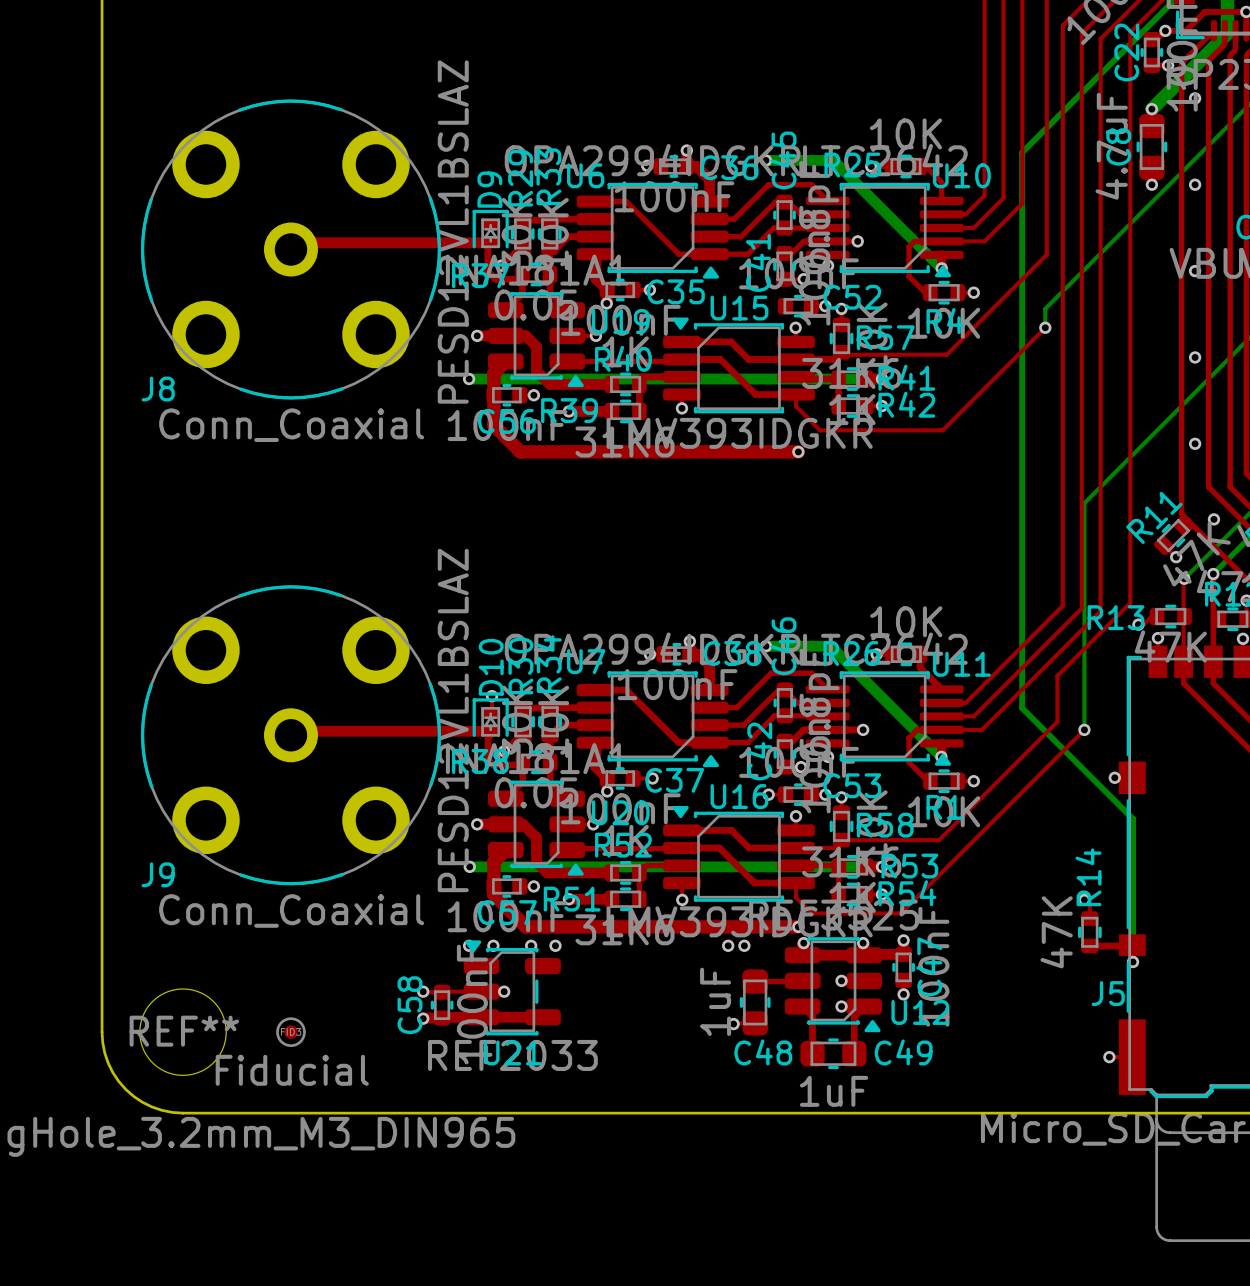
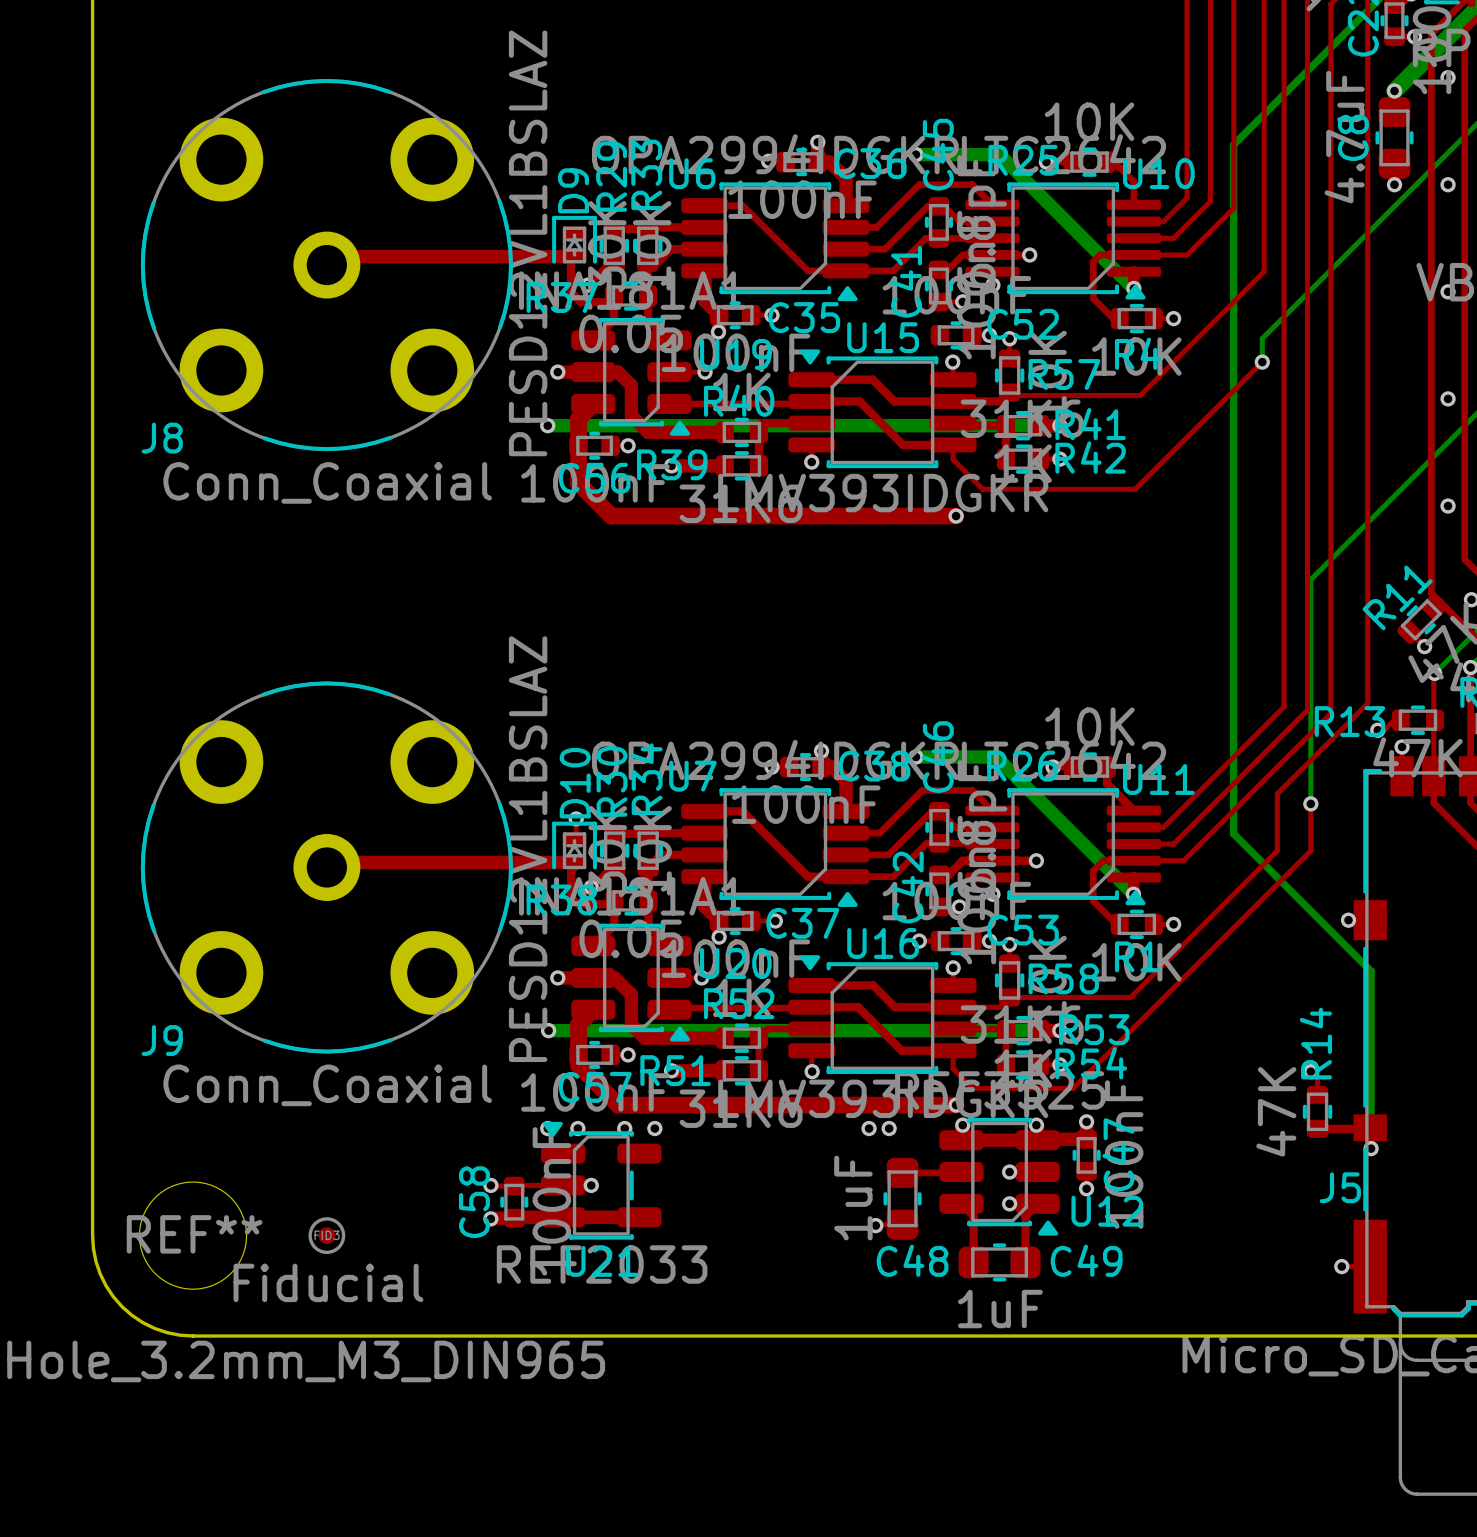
bottom track: (1084, 684) (1084, 729) -> none
top track: (1084, 729) (900, 913) (892, 913) -> (1310, 803) (1310, 850) (1073, 1088)
via position: (1084, 729) -> (1310, 803)

